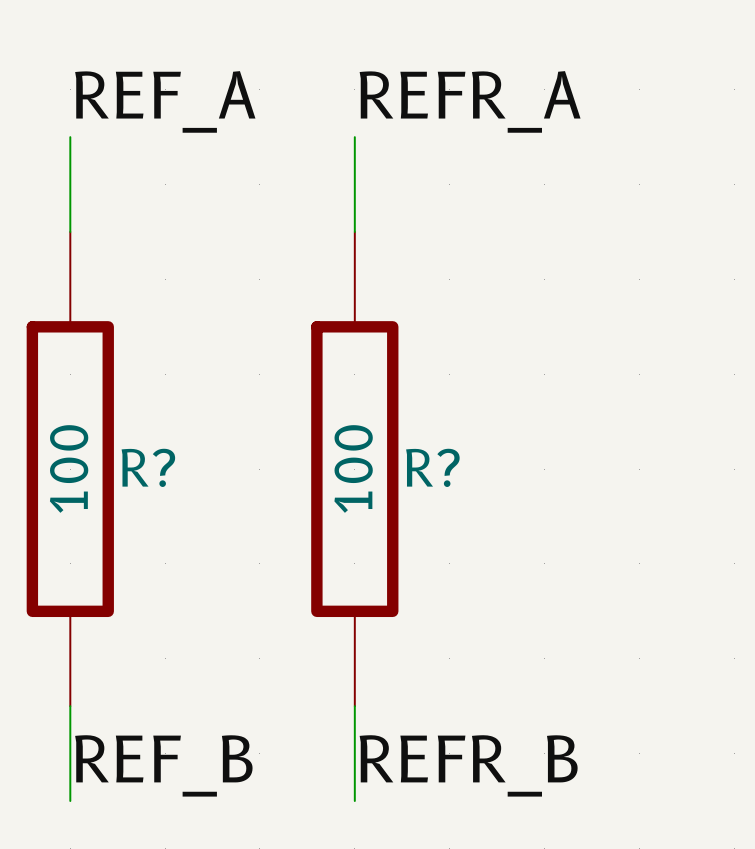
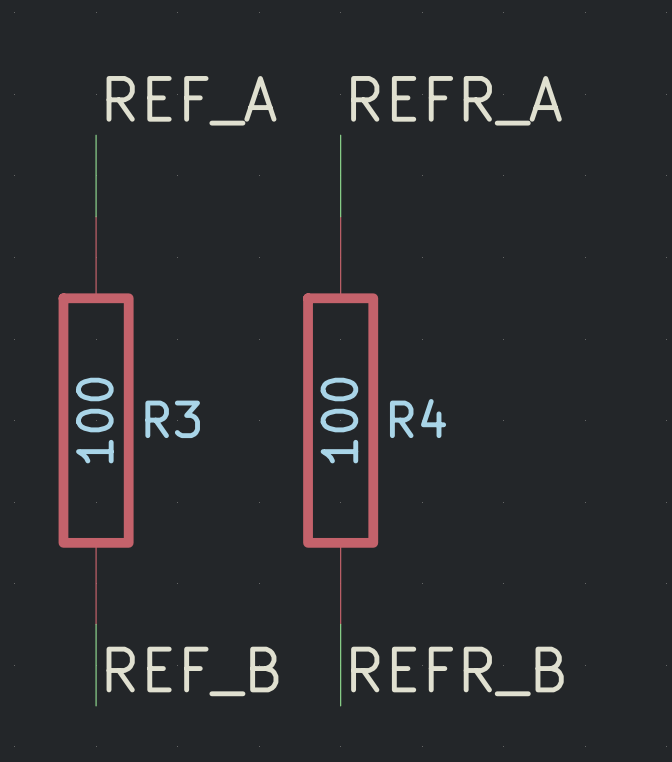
R? name: R? (148, 467) -> R3 (172, 419)
R? name: R? (432, 467) -> R4 (418, 418)

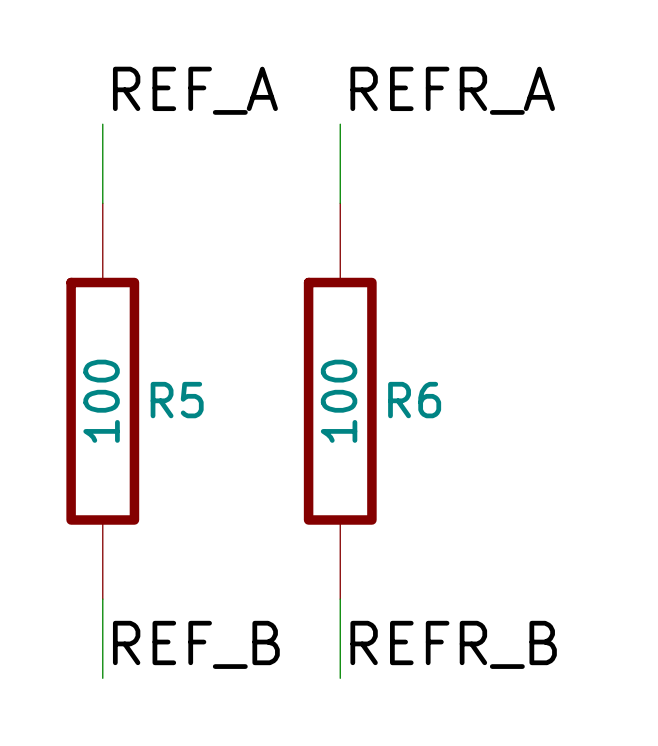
R4 name: R4 (418, 418) -> R6 (414, 400)
R3 name: R3 (172, 419) -> R5 (177, 400)

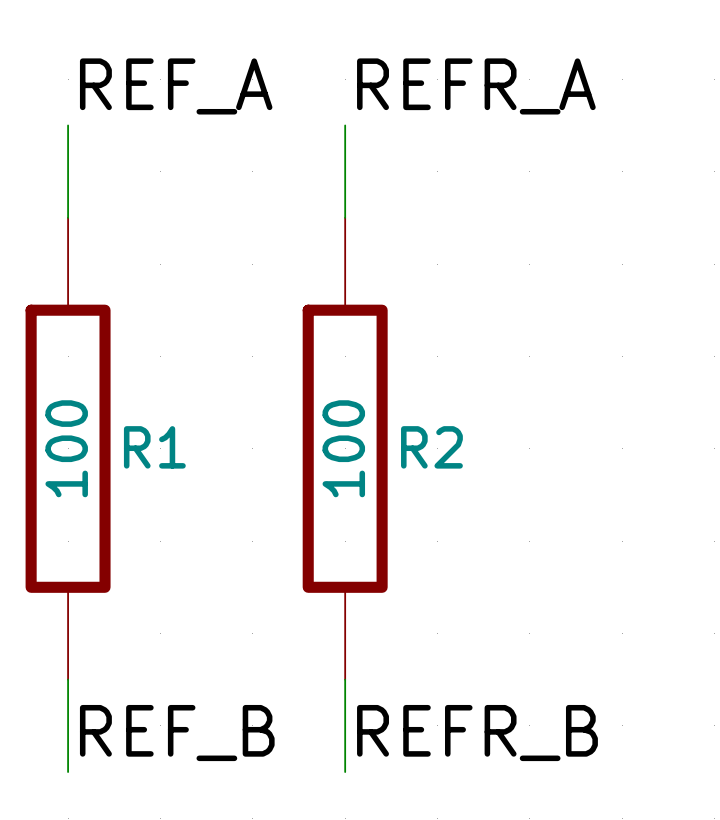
R5 name: R5 (177, 400) -> R1 (154, 447)
R6 name: R6 (414, 400) -> R2 (431, 447)

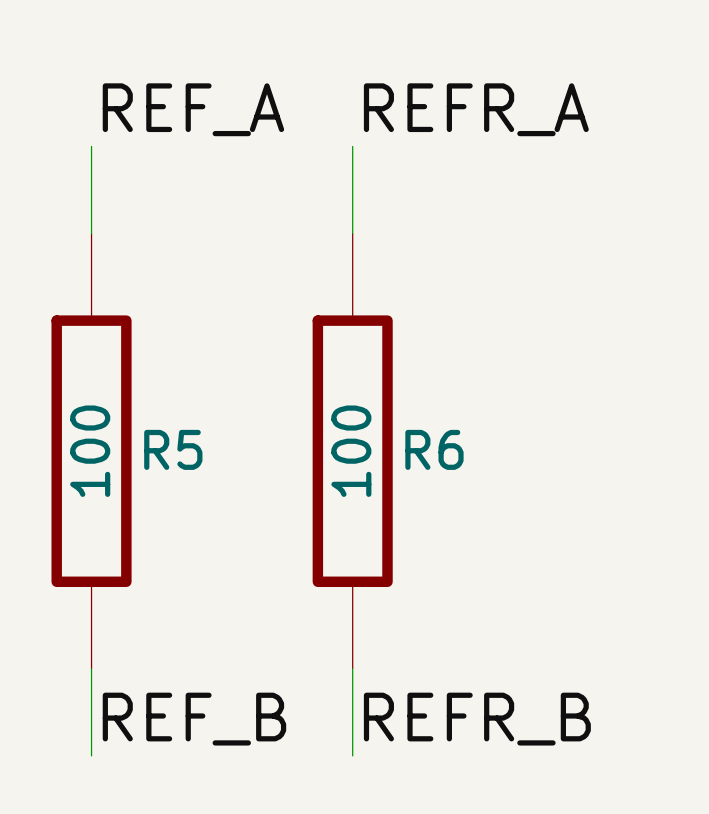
R1 name: R1 (154, 447) -> R5 (173, 449)
R2 name: R2 (431, 447) -> R6 (434, 449)

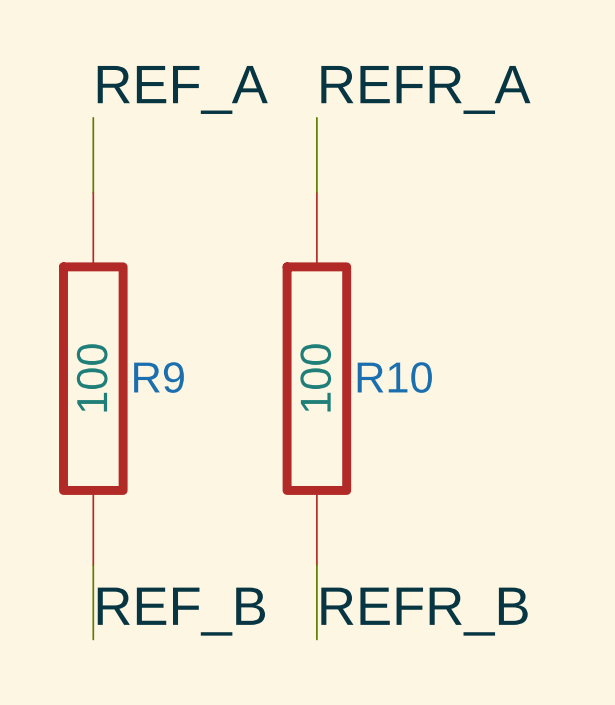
R5 name: R5 (173, 449) -> R9 (159, 377)
R6 name: R6 (434, 449) -> R10 (394, 377)

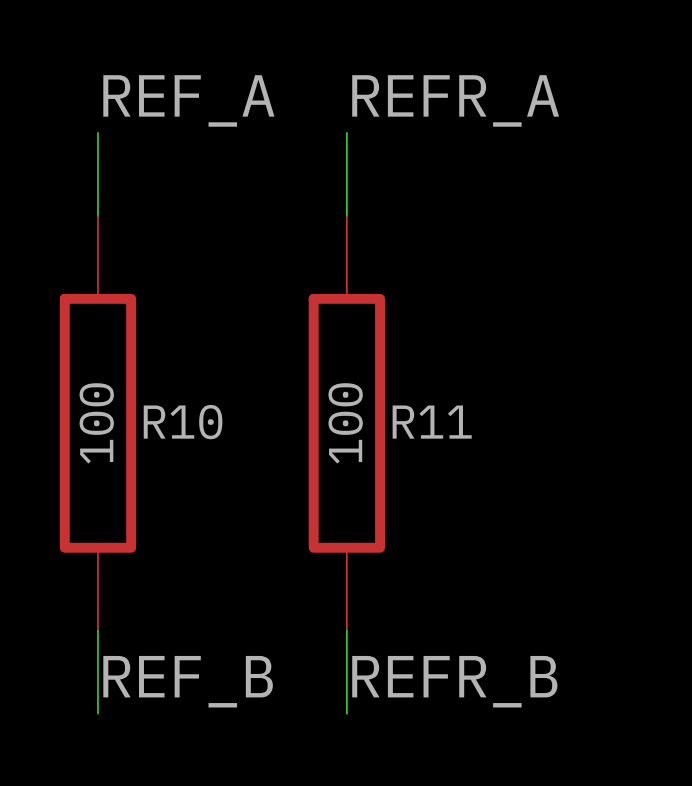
R9 name: R9 (159, 377) -> R10 (183, 422)
R10 name: R10 (394, 377) -> R11 (432, 422)

